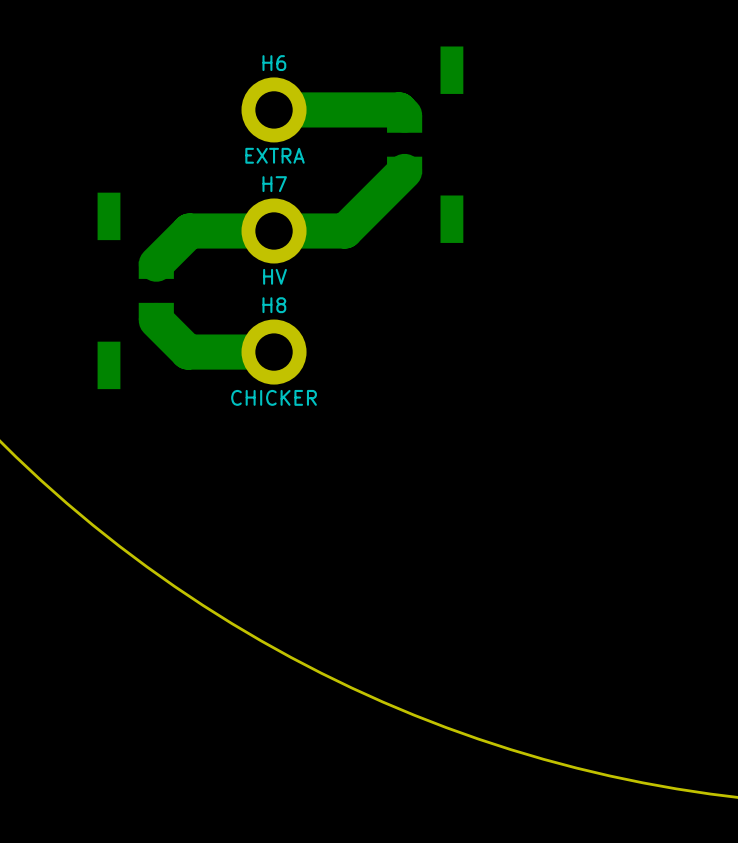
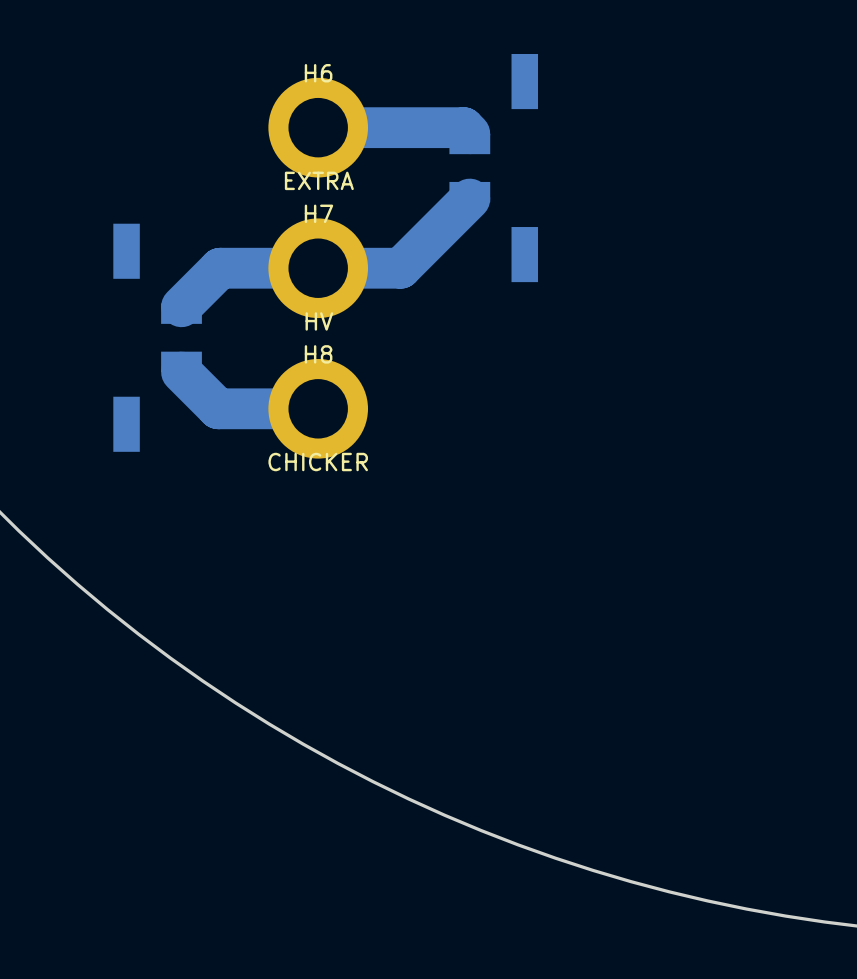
H6 footprint: [241, 77, 307, 143] -> [268, 77, 369, 178]
H7 footprint: [241, 198, 307, 264] -> [268, 218, 369, 319]
H8 footprint: [241, 319, 307, 385] -> [268, 358, 369, 459]

